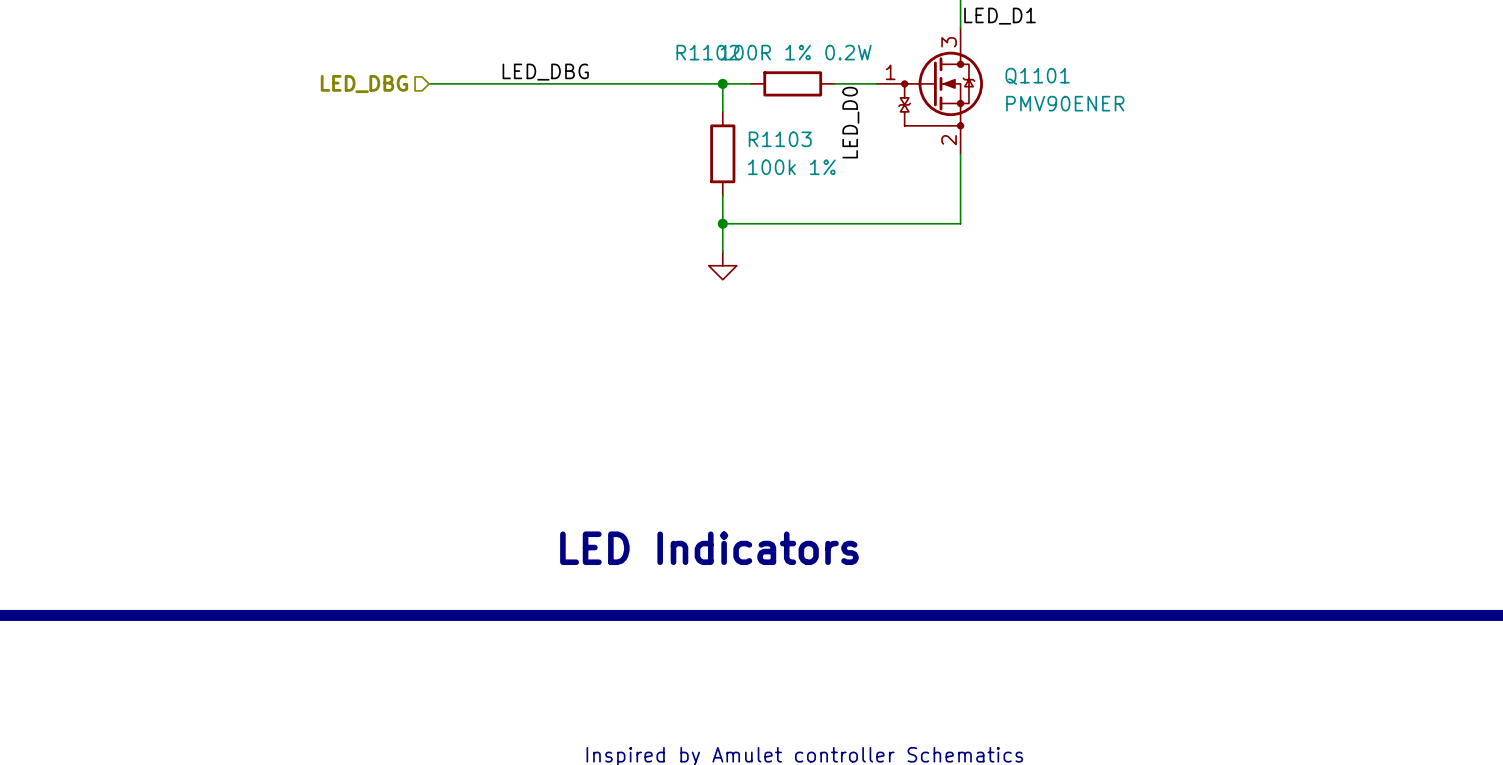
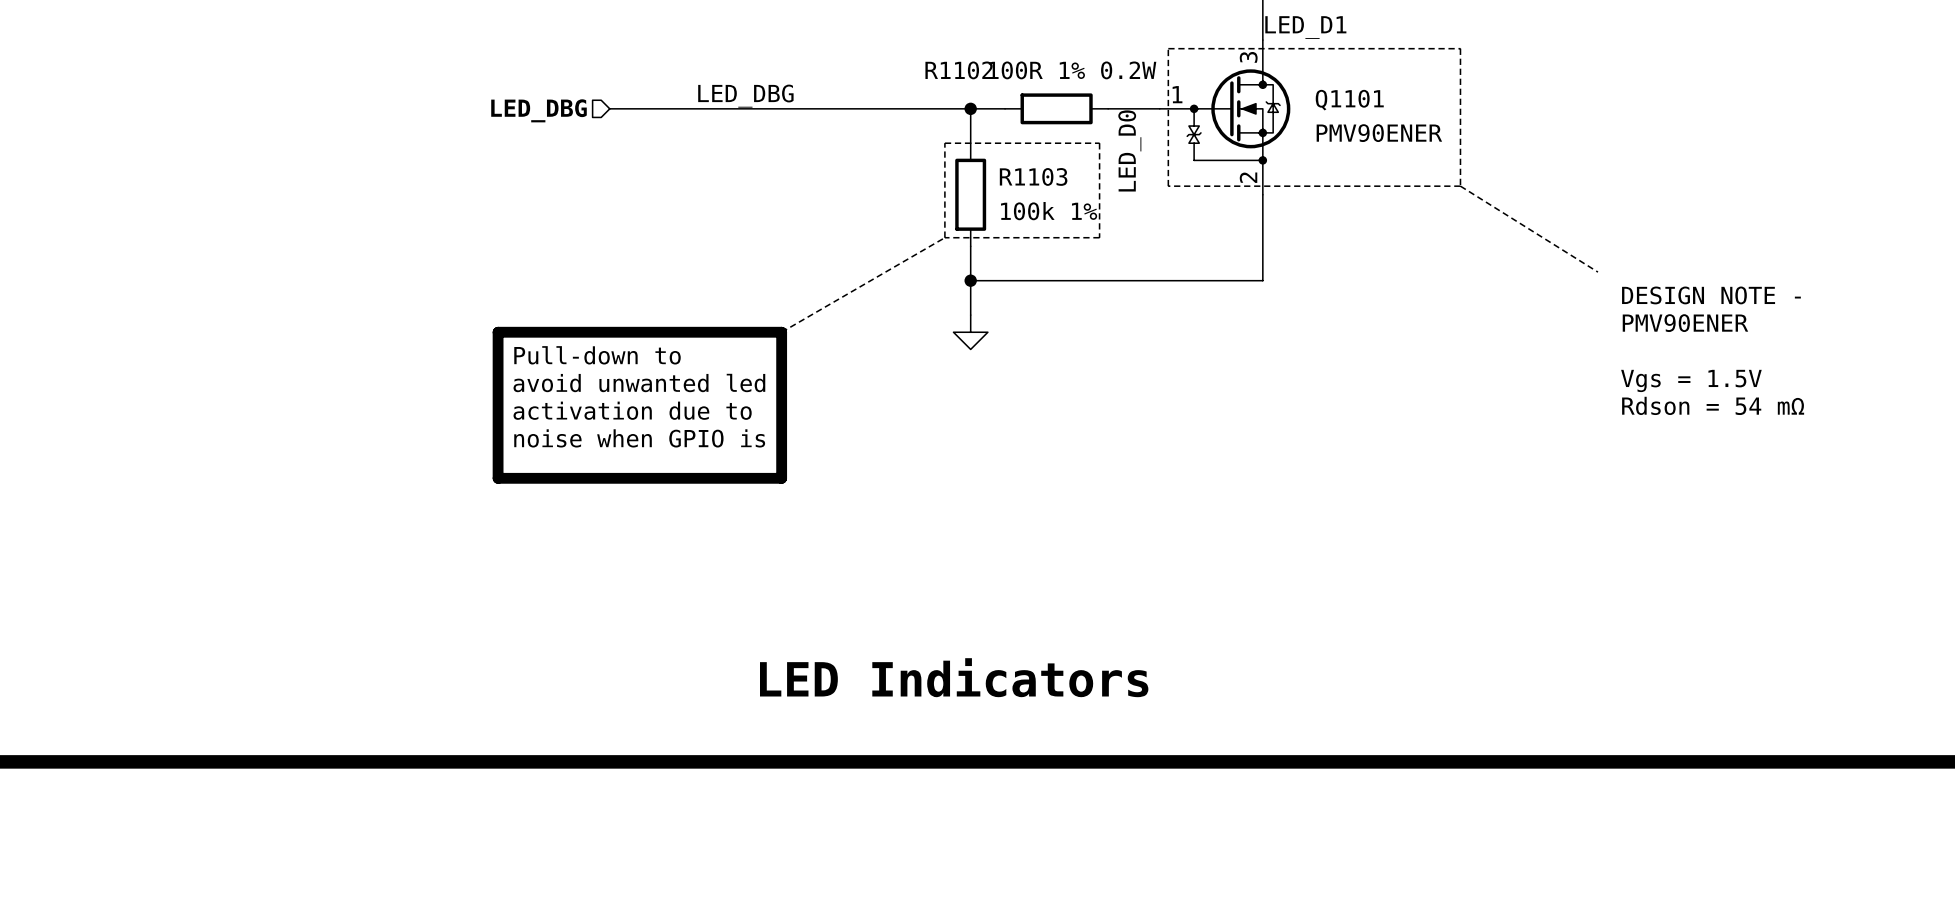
line: none -> (1460, 186) (1597, 272)
line: none -> (1460, 186) (1460, 48) (1168, 48) (1168, 186) (1460, 186)
line: none -> (944, 237) (781, 332)
line: none -> (944, 237) (1099, 237) (1099, 143) (944, 143) (944, 237)
text: none -> DESIGN NOTE - (1711, 295)
text: none -> PMV90ENER (1685, 323)
line: none -> (781, 332) (498, 332) (498, 478) (781, 478) (781, 332)
text: none -> Pull-down to (597, 355)
text: none -> Vgs = 1.5V (1691, 380)
text: none -> avoid unwanted led (639, 382)
text: none -> Rdson = 54 mΩ (1713, 405)
text: none -> activation due to (632, 410)
text: none -> noise when GPIO is (639, 438)

